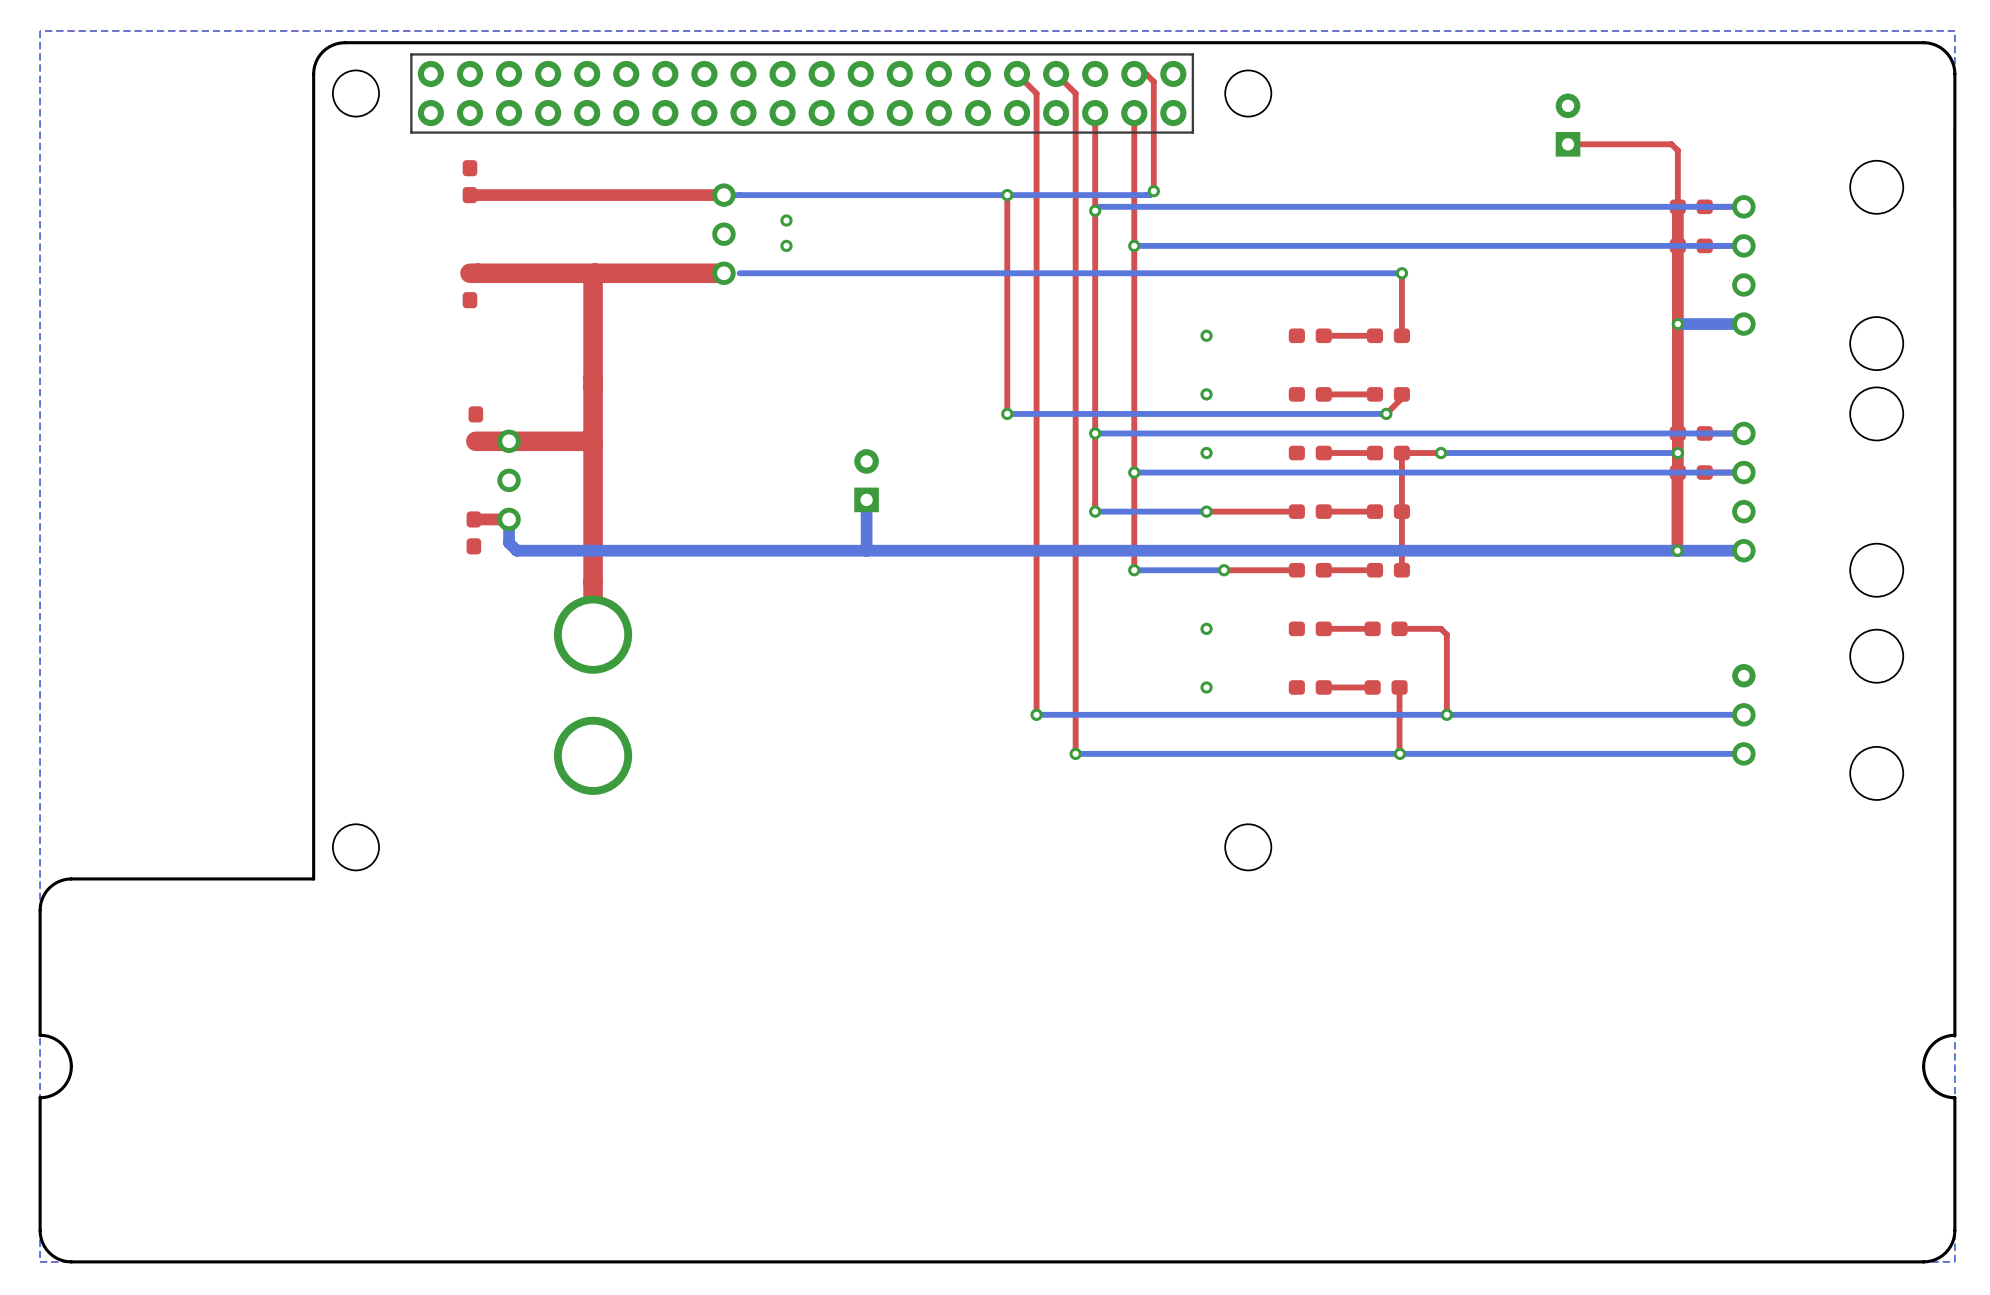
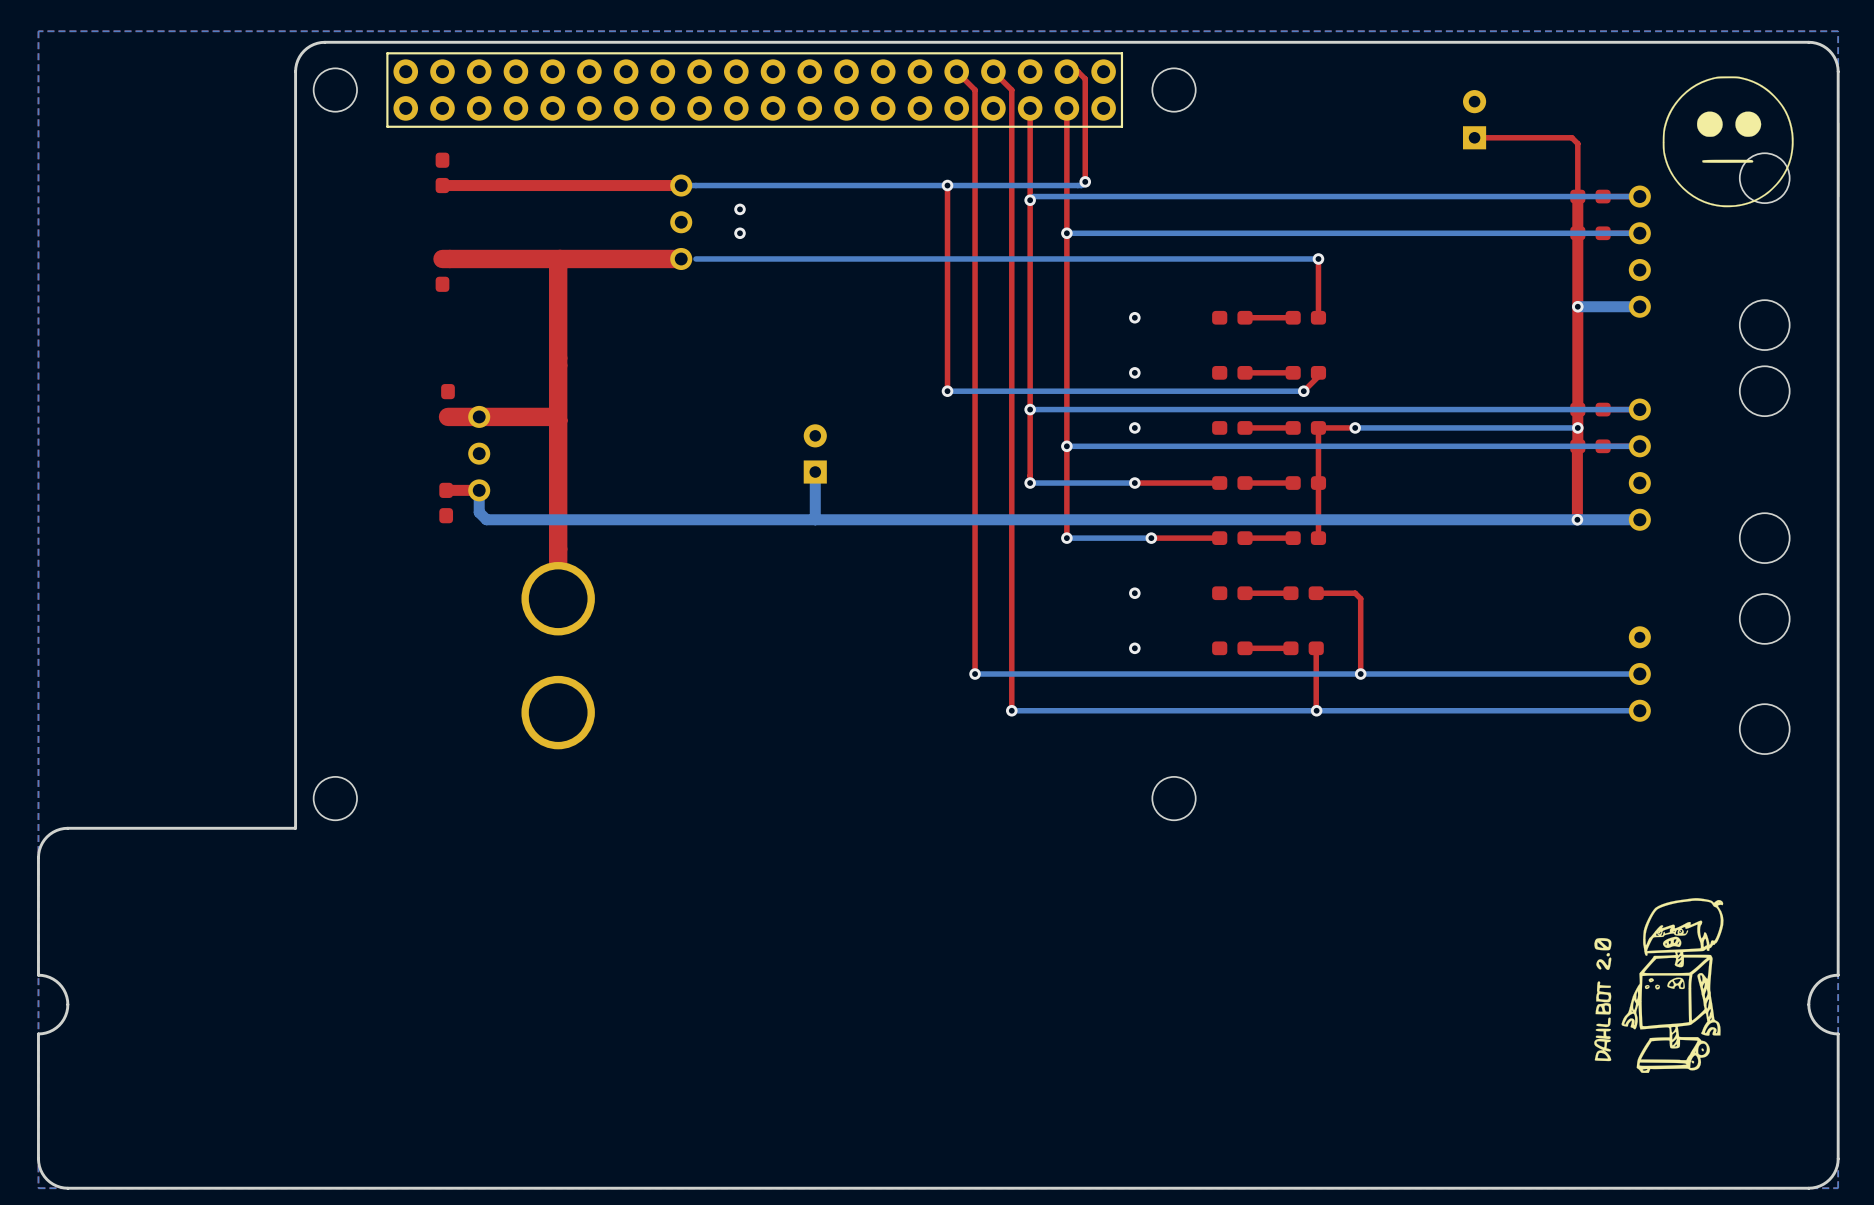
drawing: none -> [1662, 76, 1794, 208]
drawing: none -> [1594, 898, 1724, 1073]

